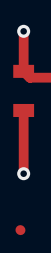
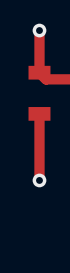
top track: (20, 229) (20, 230) -> none

